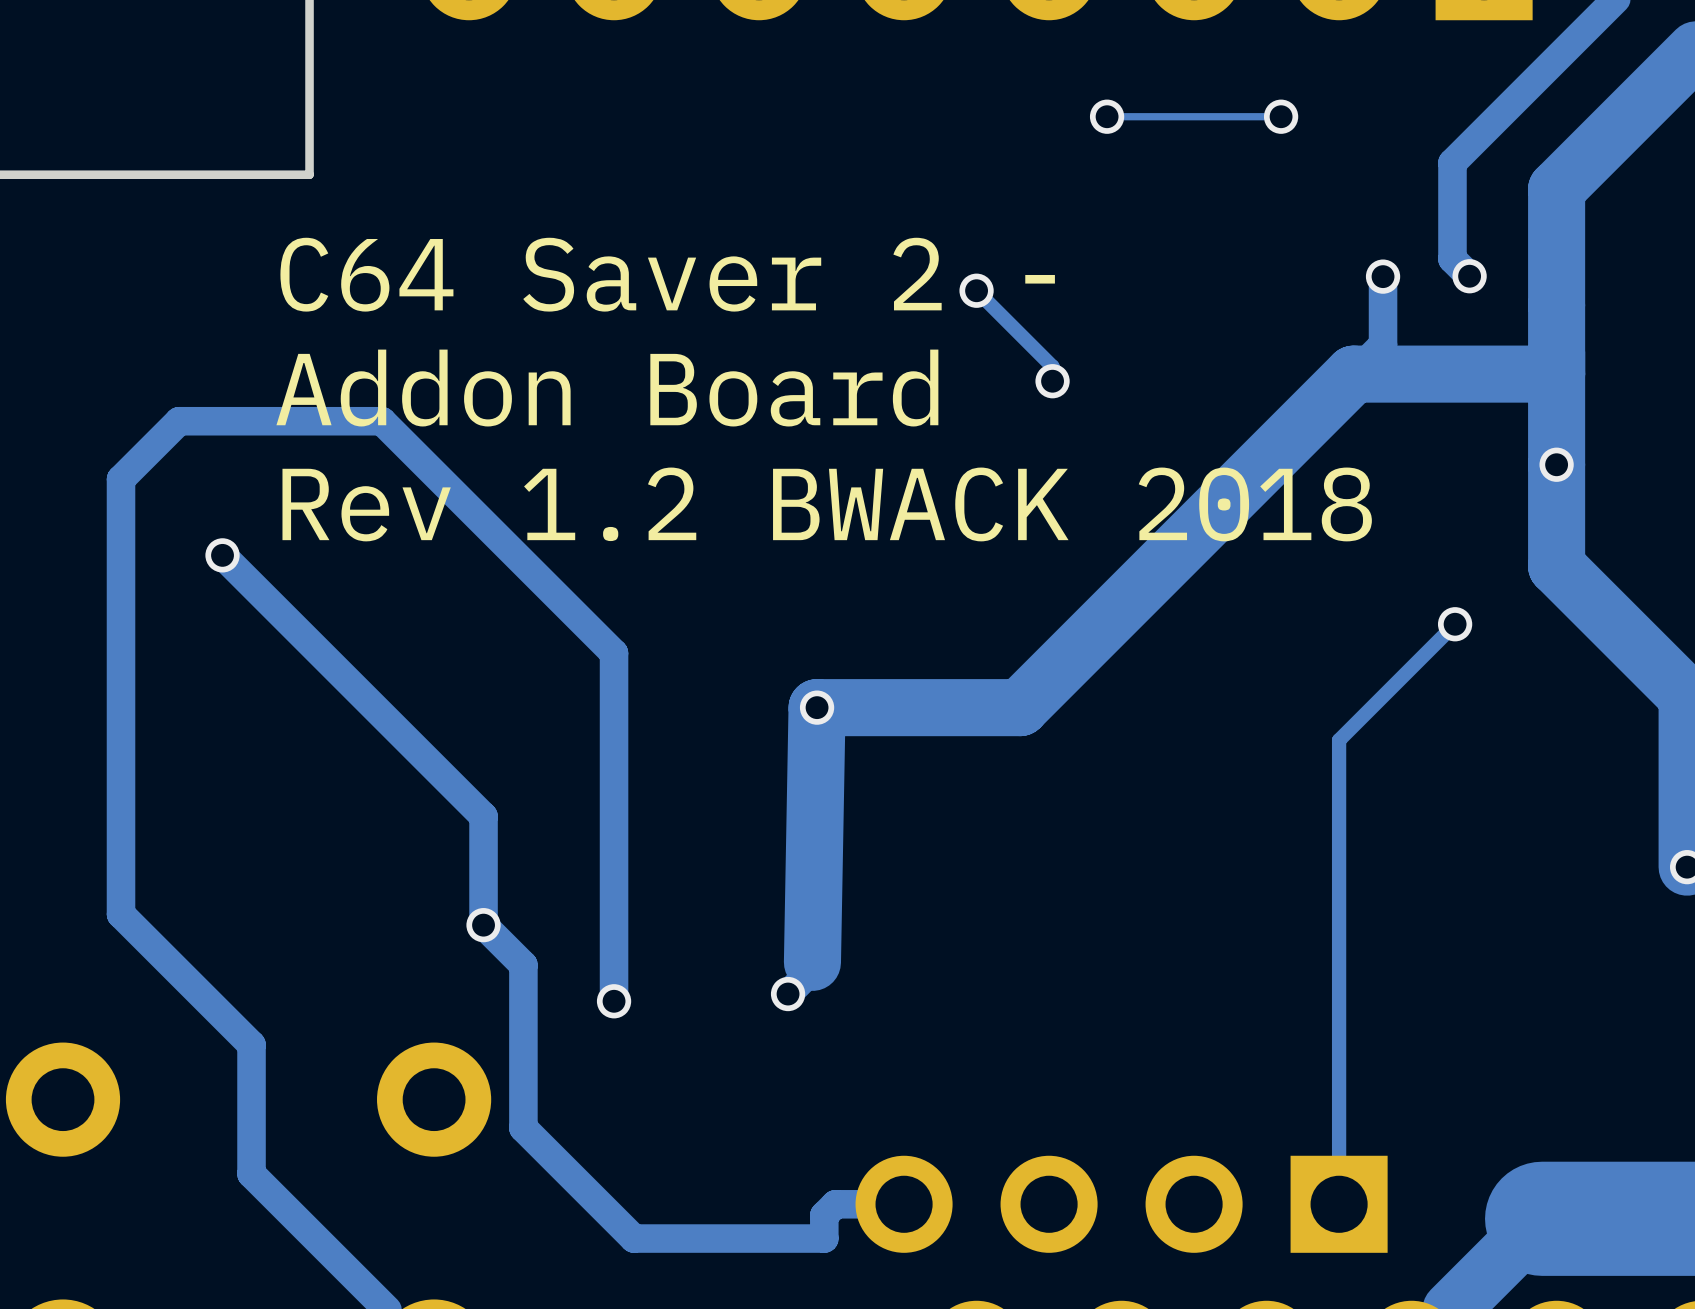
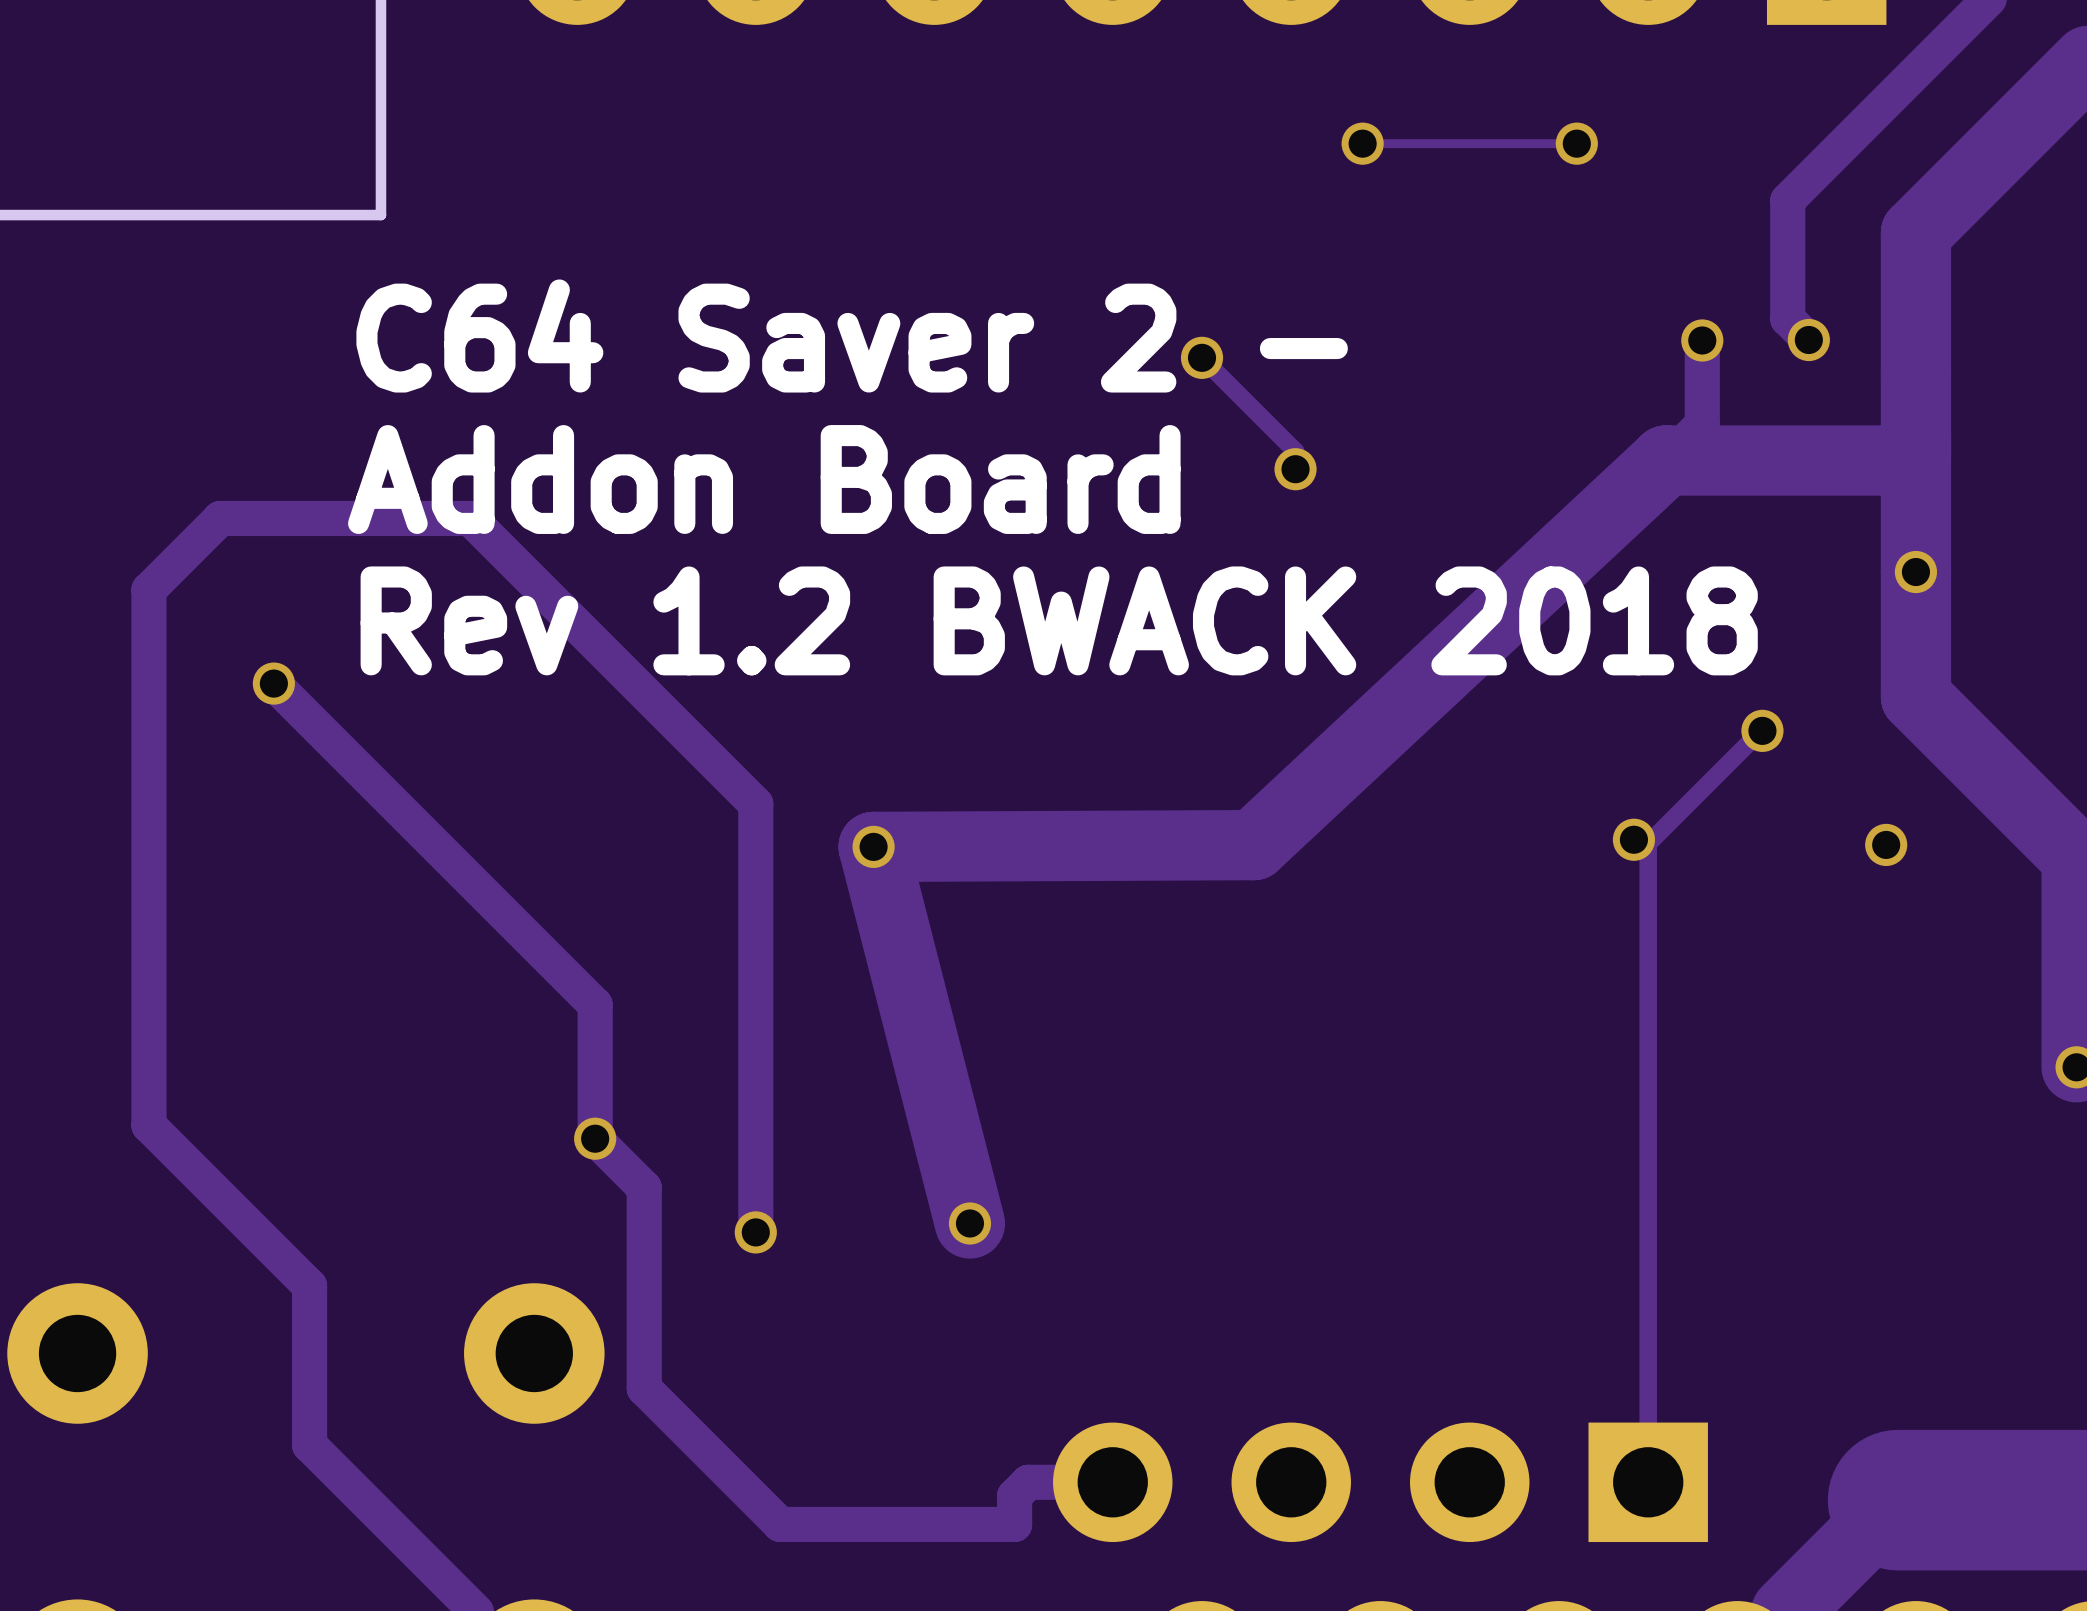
track: (1353, 374) (1020, 707) (817, 707) (812, 969) (788, 994) -> (1666, 460) (1253, 845) (873, 846) (969, 1223)
track: (1455, 624) (1339, 740) -> (1762, 730) (1648, 843) (1648, 911)
via position: (1455, 624) -> (1762, 730)
via: none -> (1633, 839)
via: none -> (1886, 844)
via position: (817, 707) -> (873, 846)

